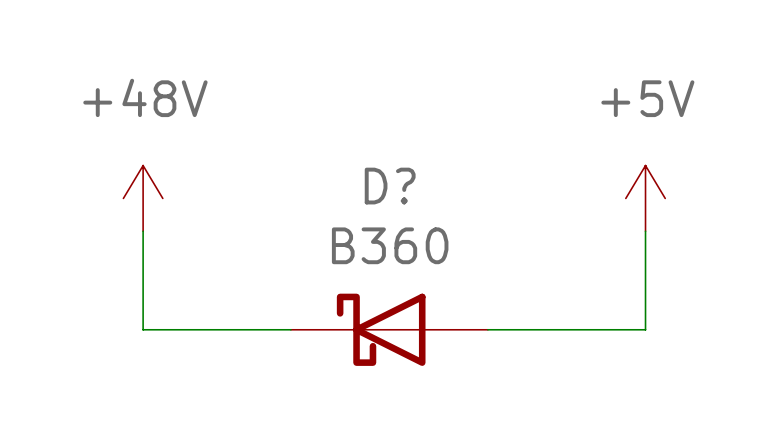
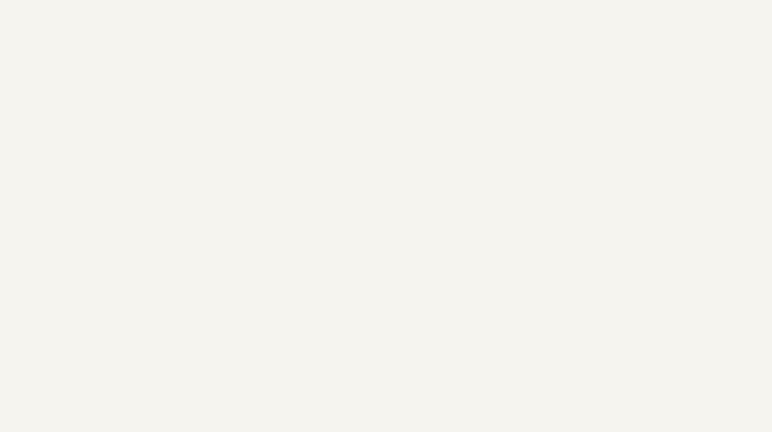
power symbol: +48V (143, 198) -> none
power symbol: +5V (645, 198) -> none
wire: (143, 231) (143, 329) (290, 329) -> none
wire: (645, 231) (645, 329) (487, 329) -> none
D?: B360 (389, 329) -> none

